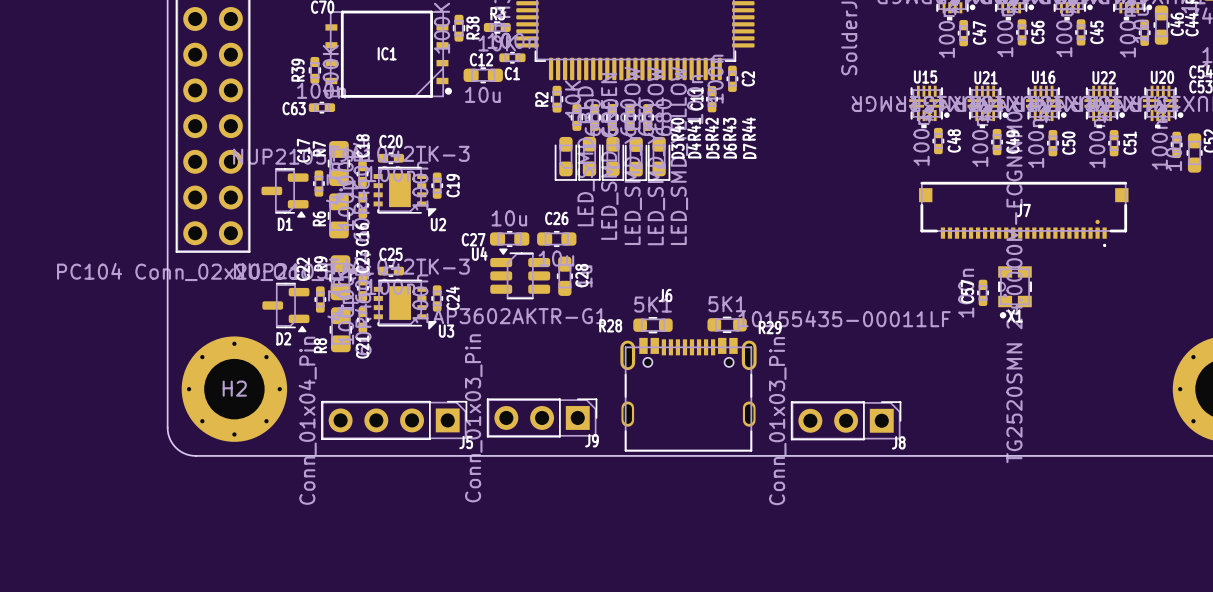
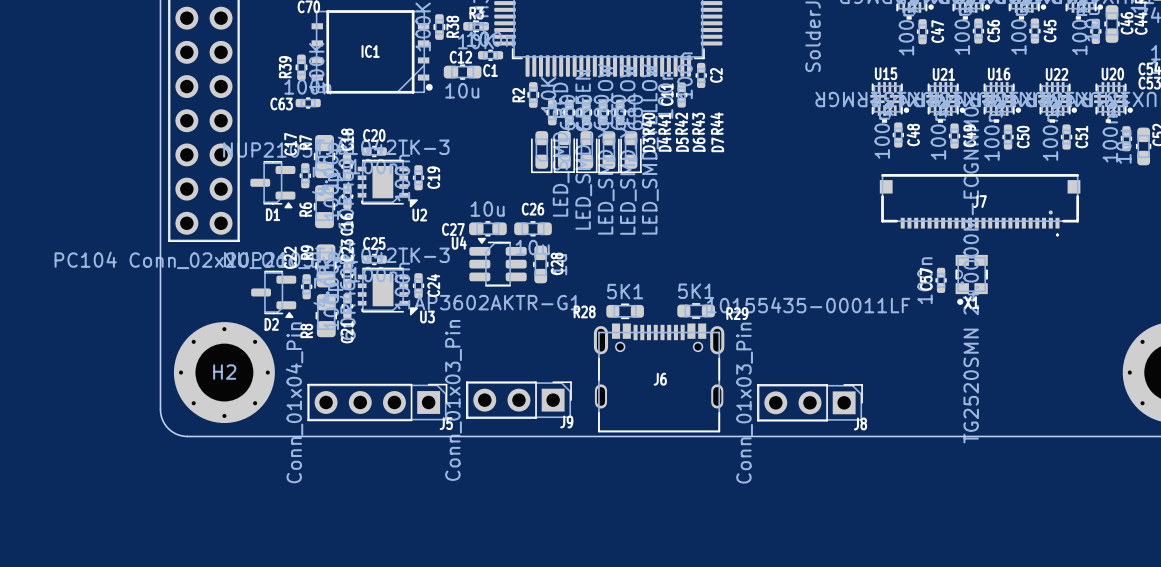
J6 name position: J6 (665, 295) -> J6 (660, 379)

